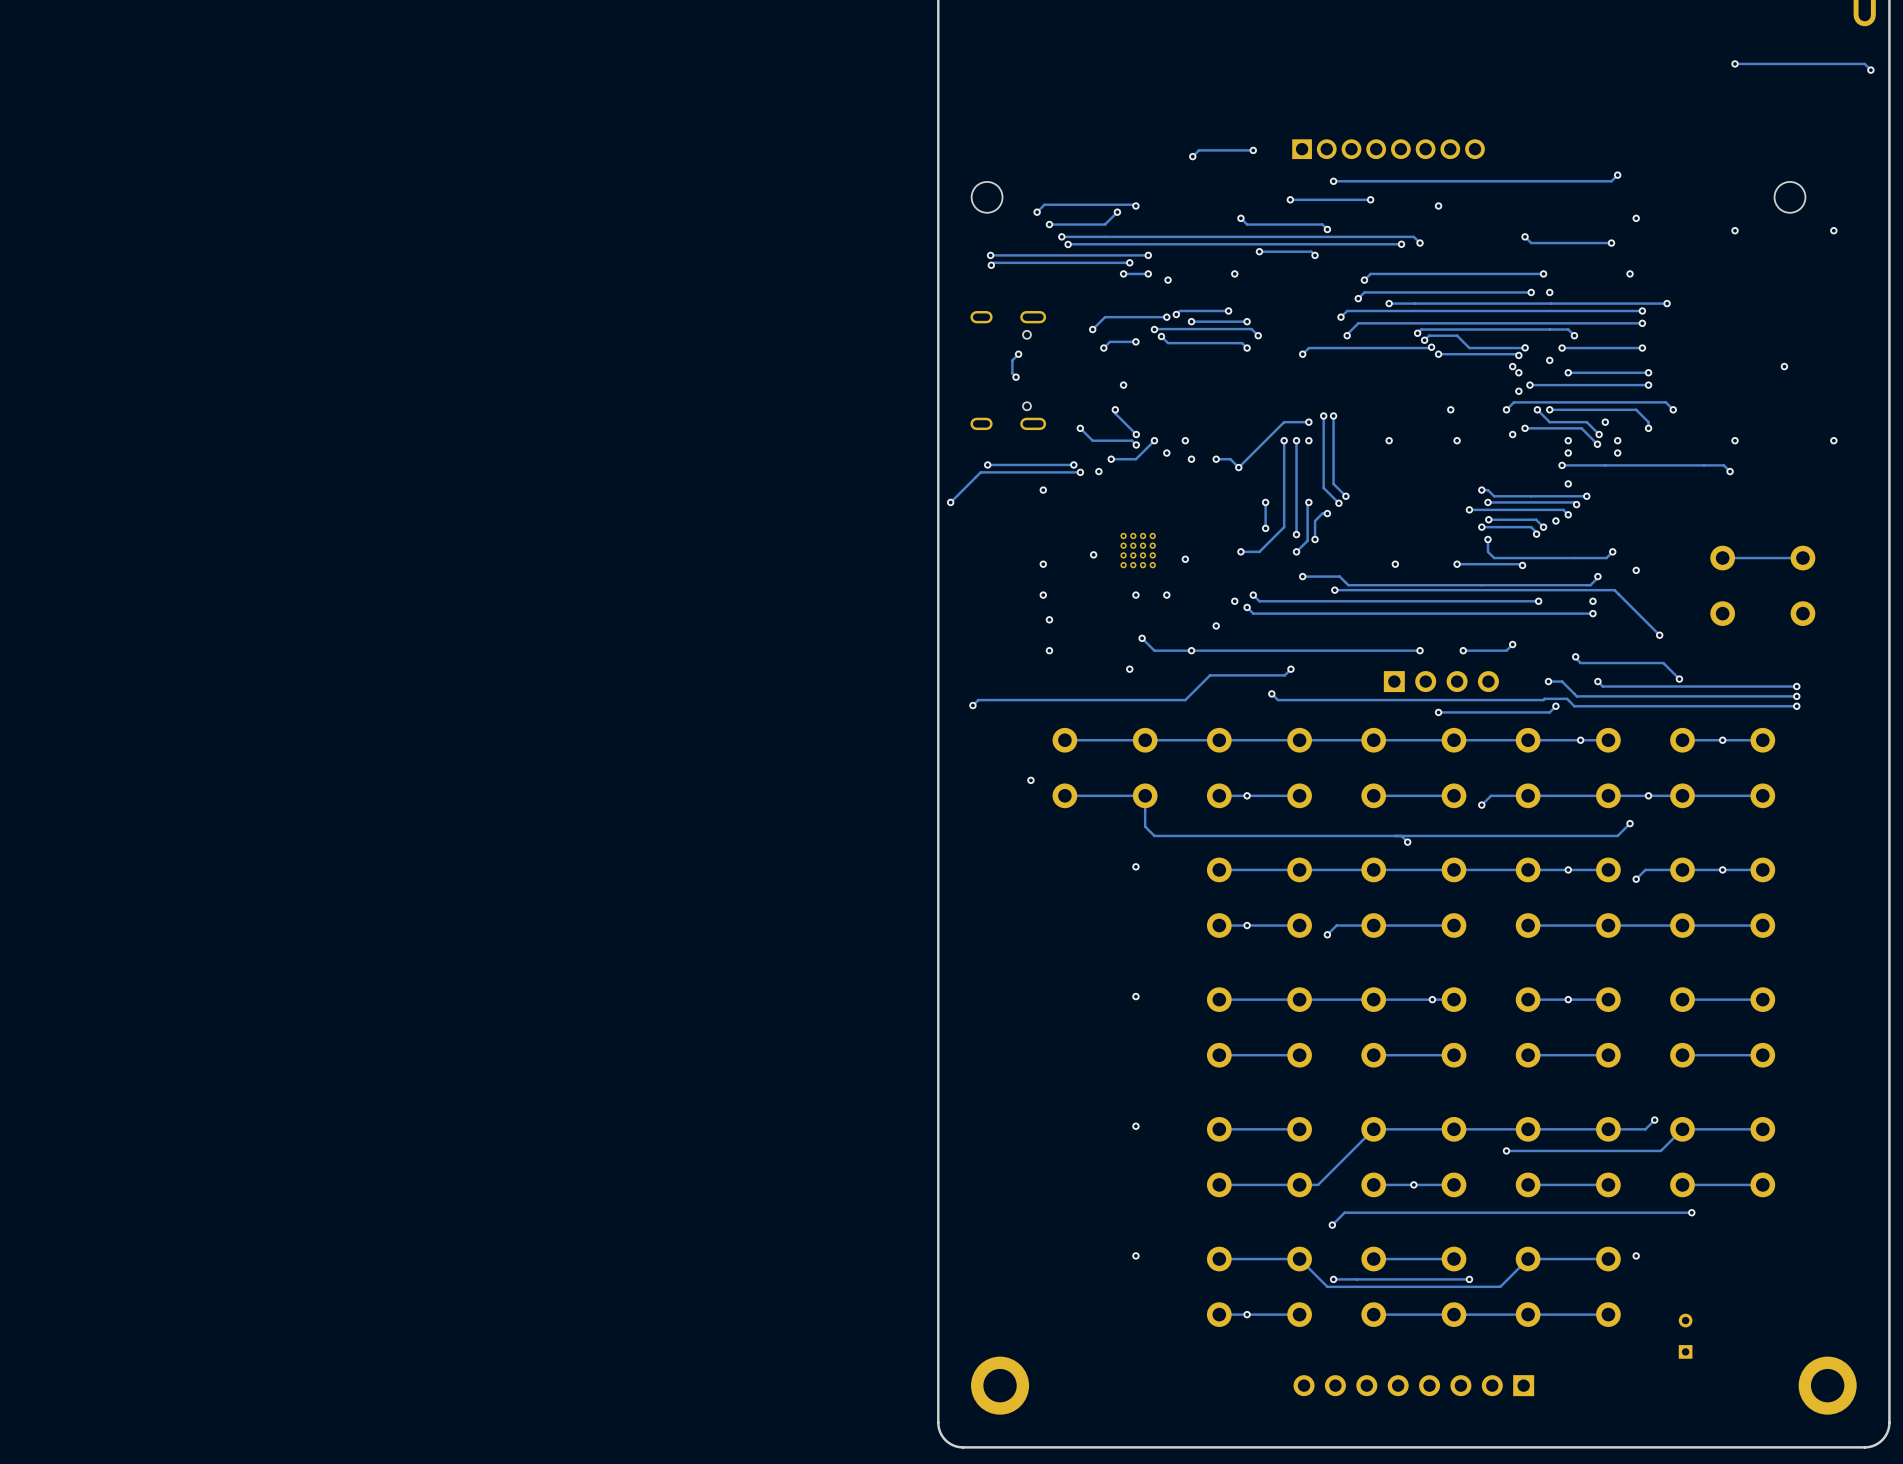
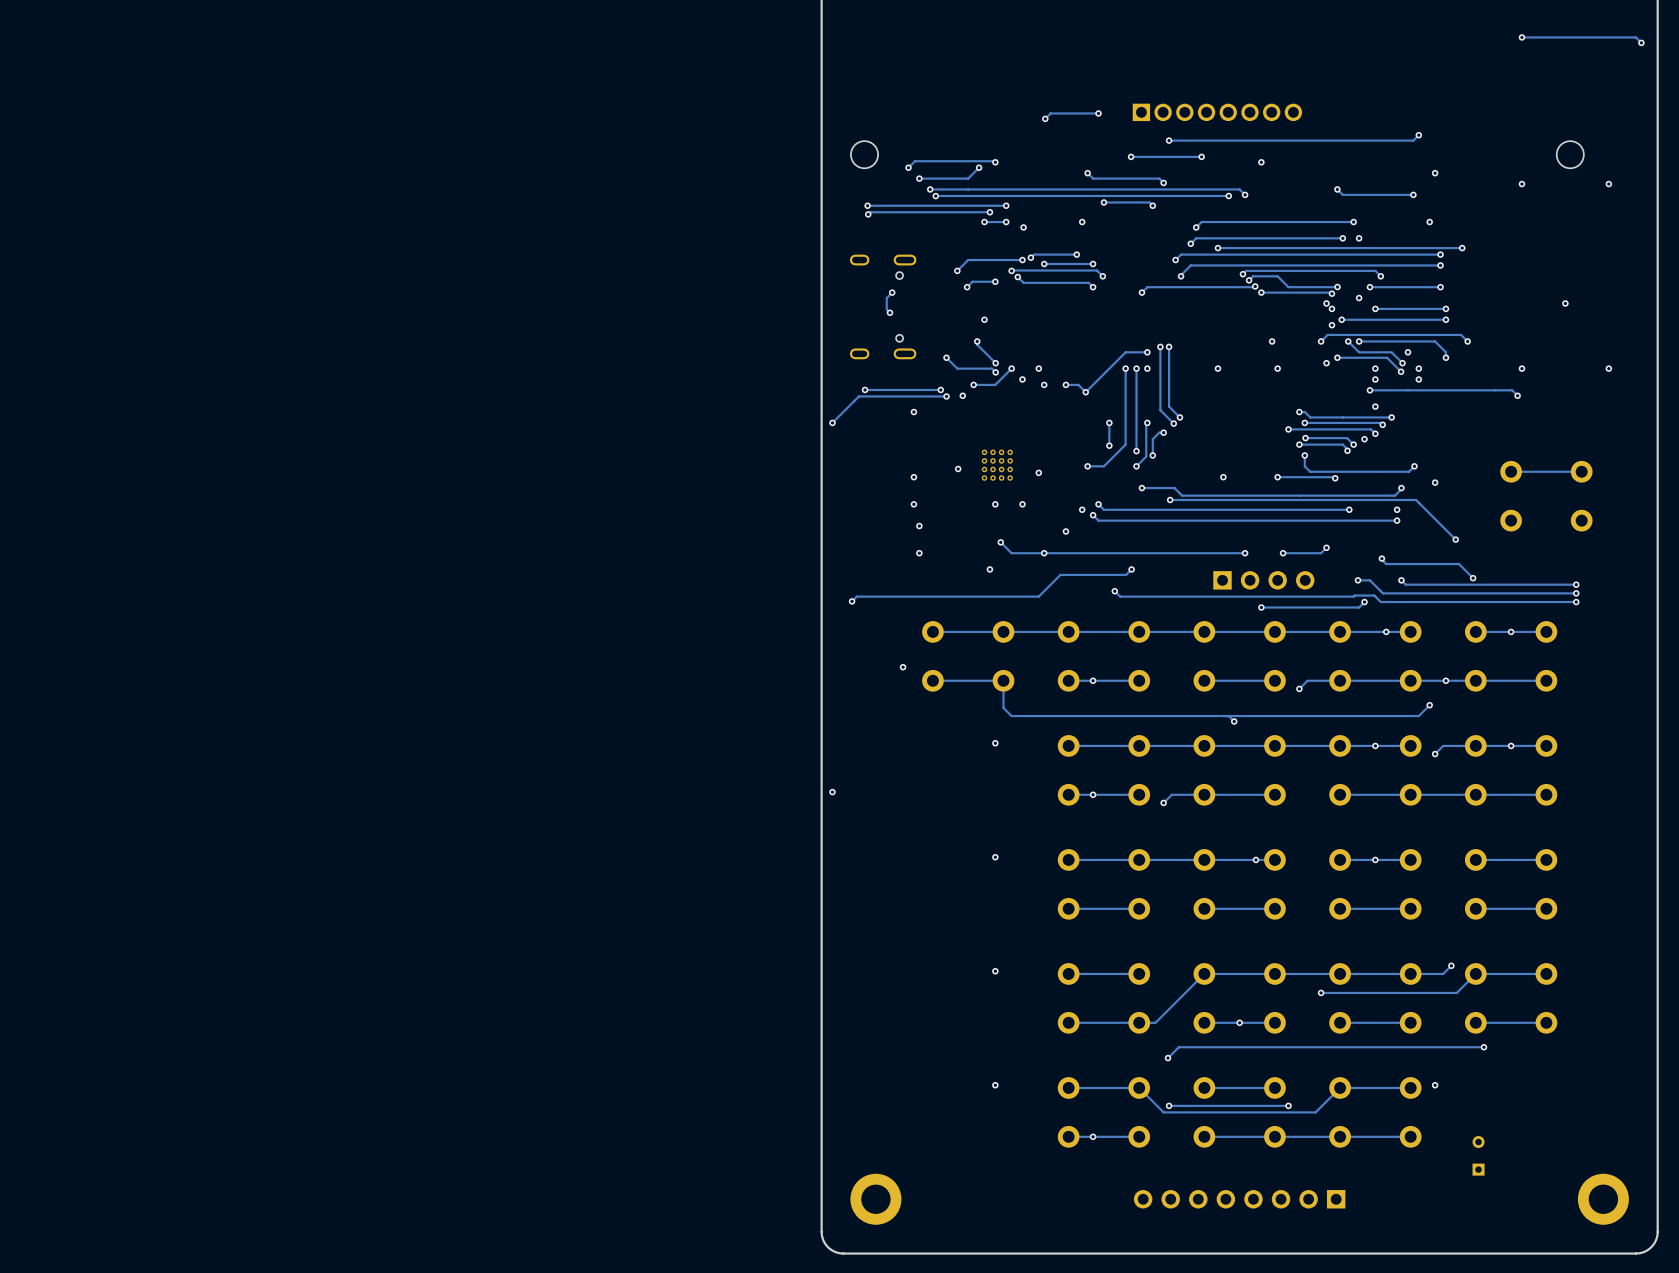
via: none -> (832, 792)

